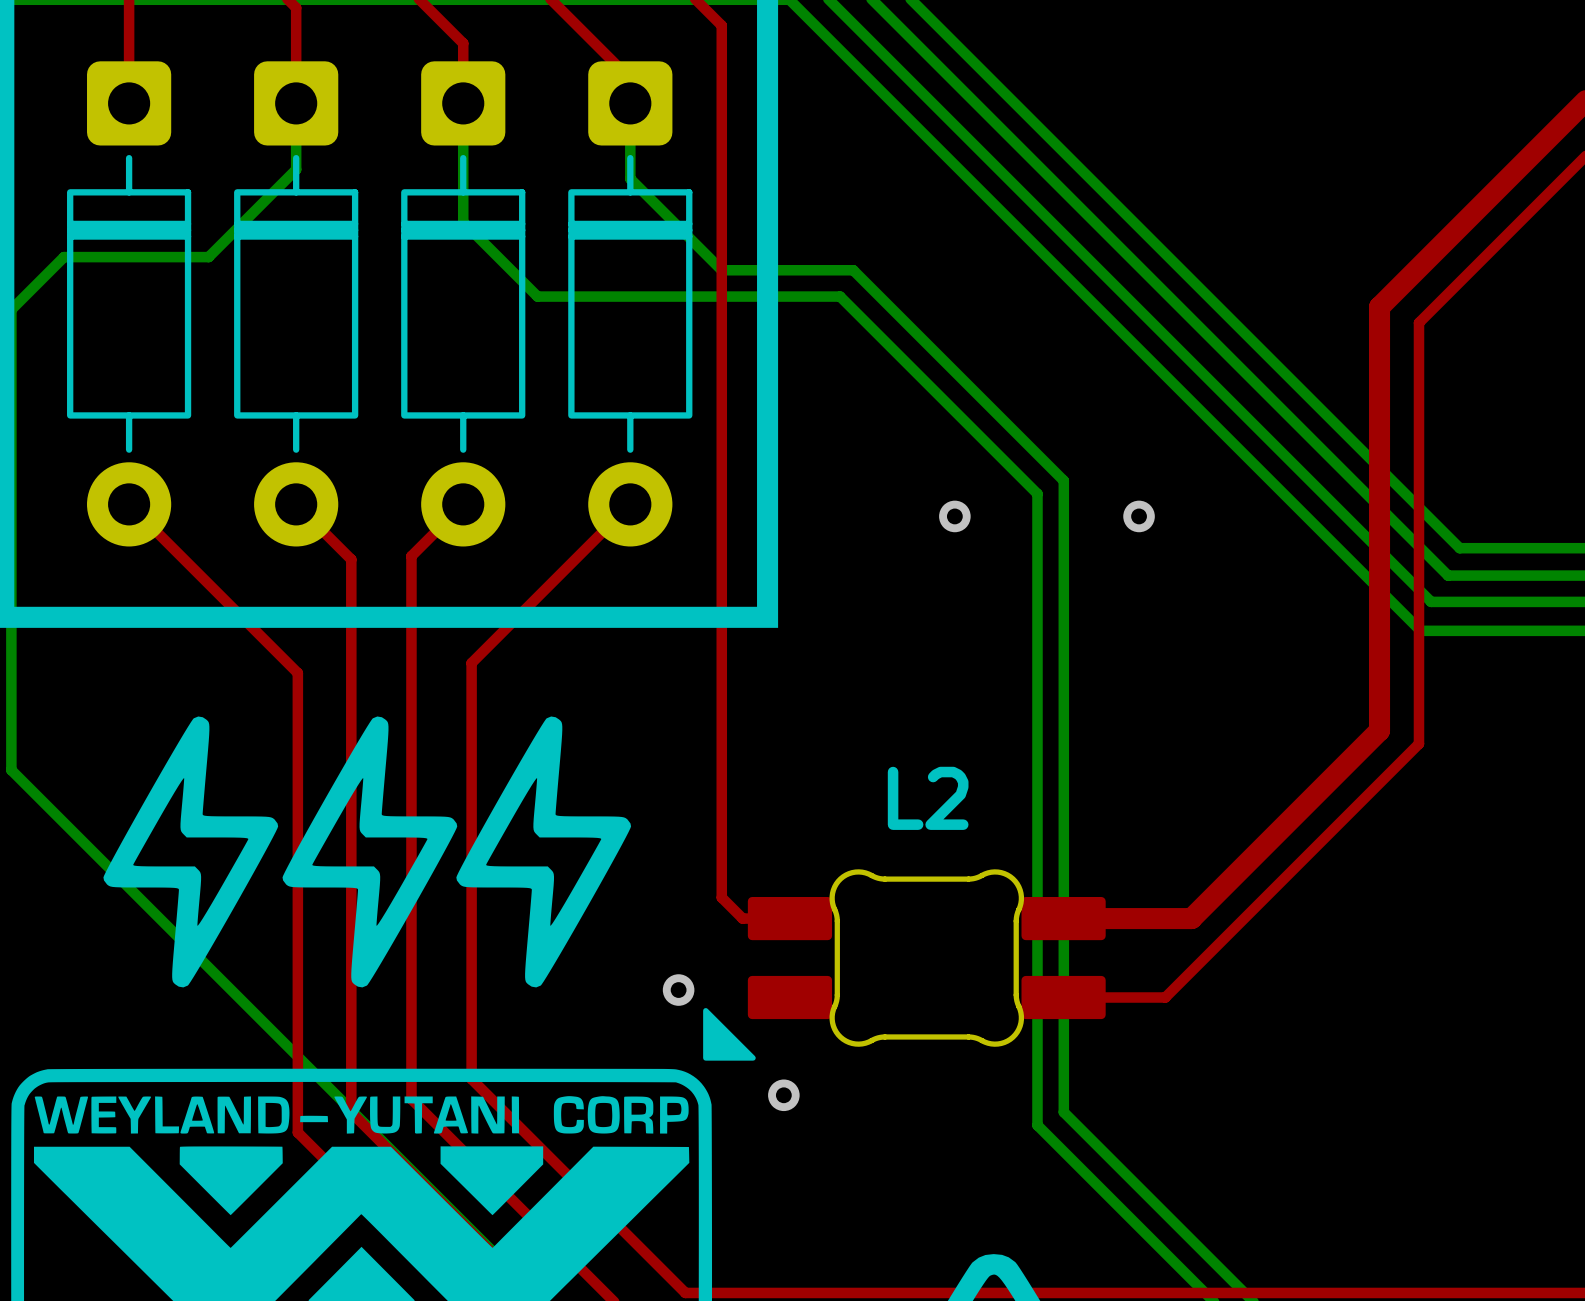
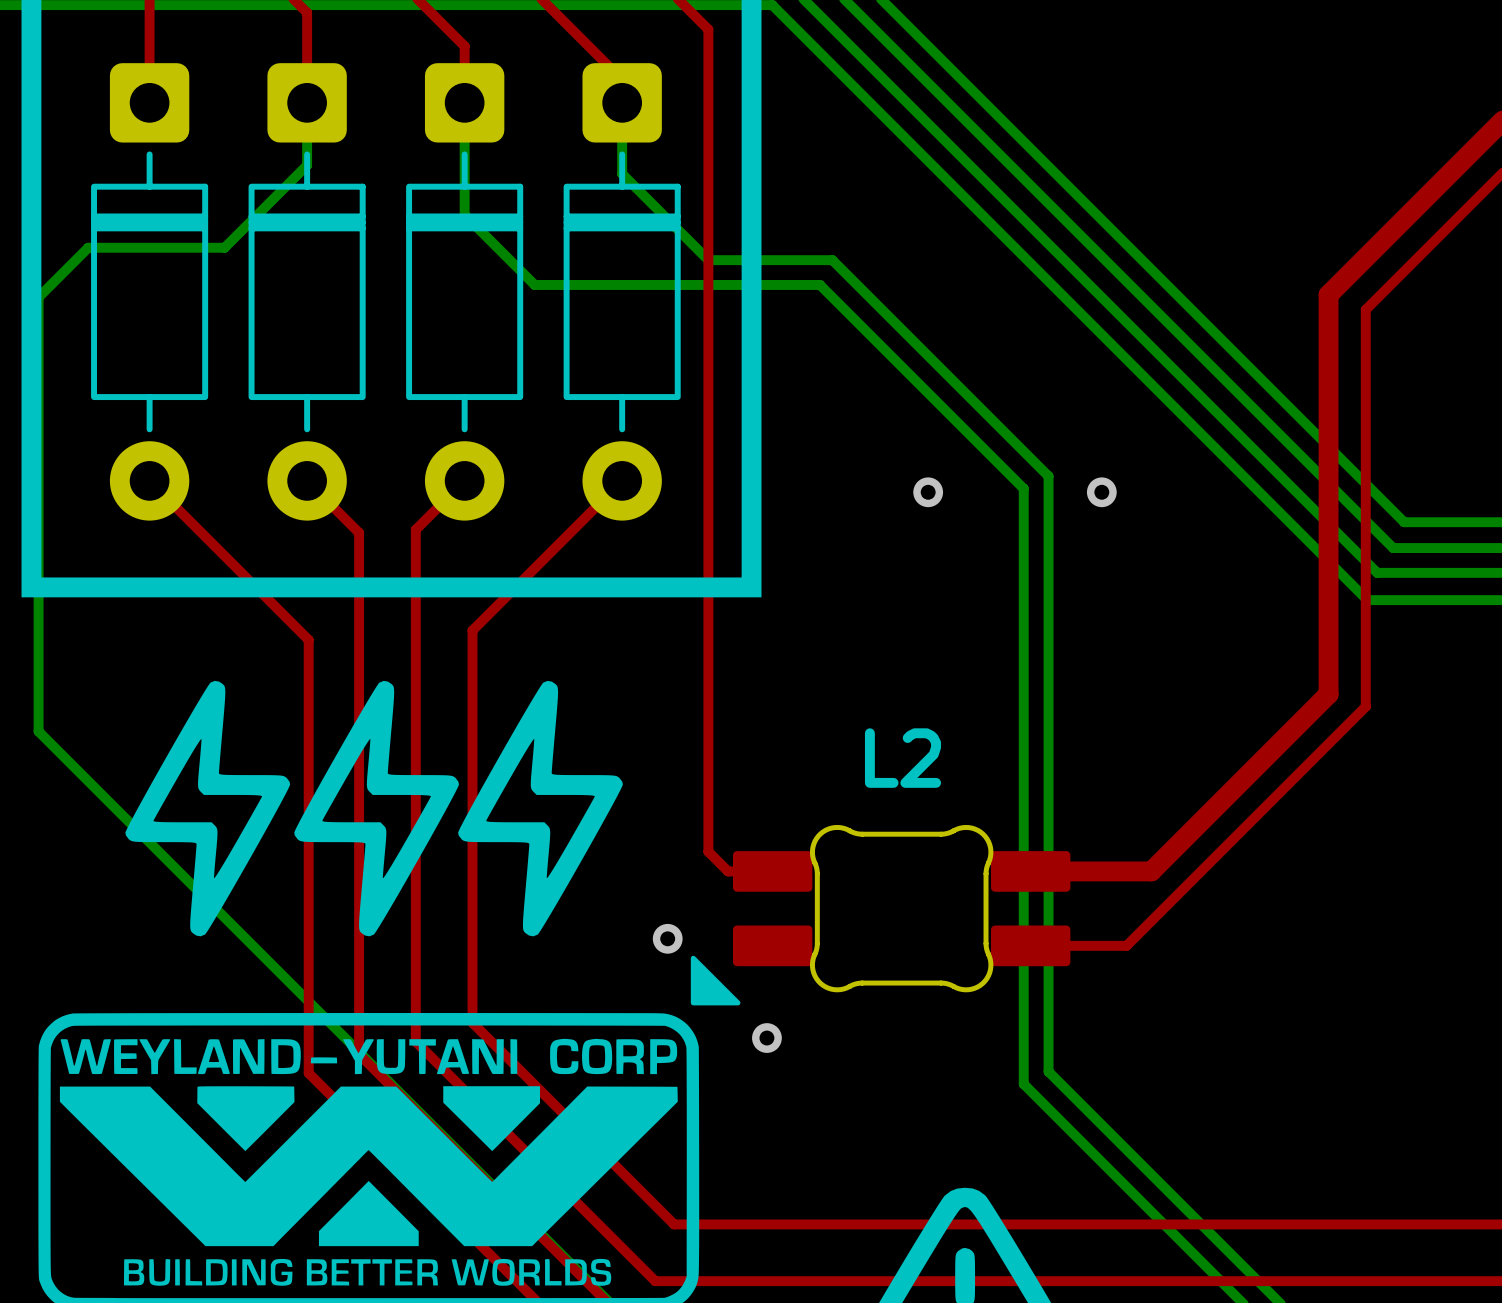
bottom track: (1063, 480) (1063, 1112) (1082, 1130) -> (1030, 458) (1048, 476) (1048, 1071)
bottom track: (1037, 493) (1037, 1125) (1056, 1144) -> (1006, 471) (1023, 488) (1023, 1084)

